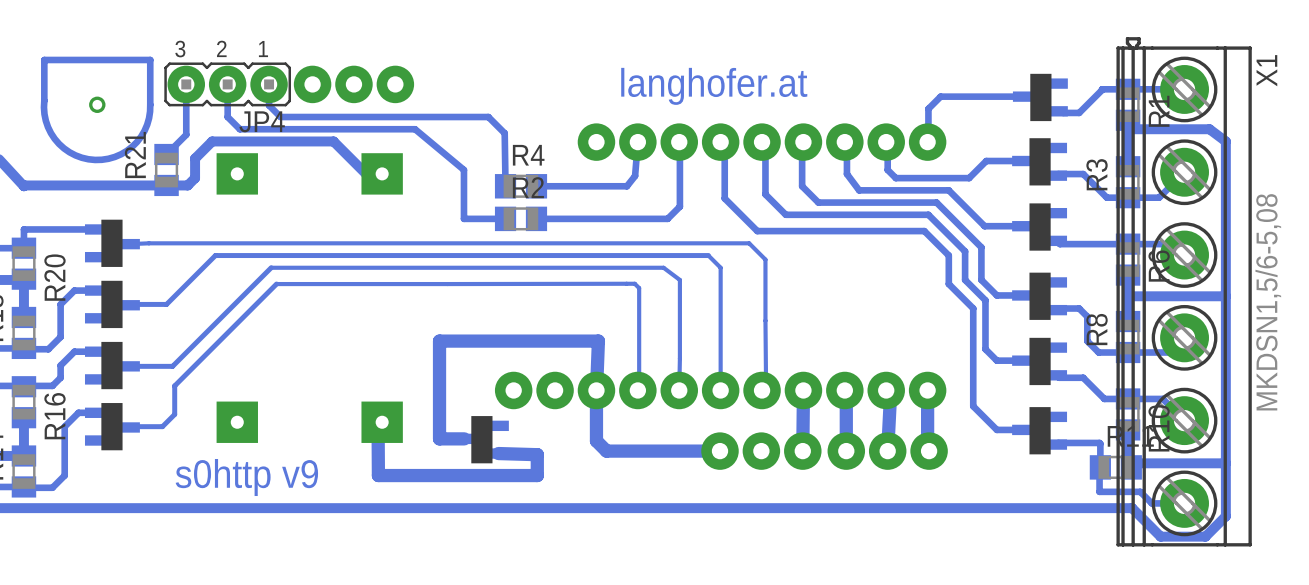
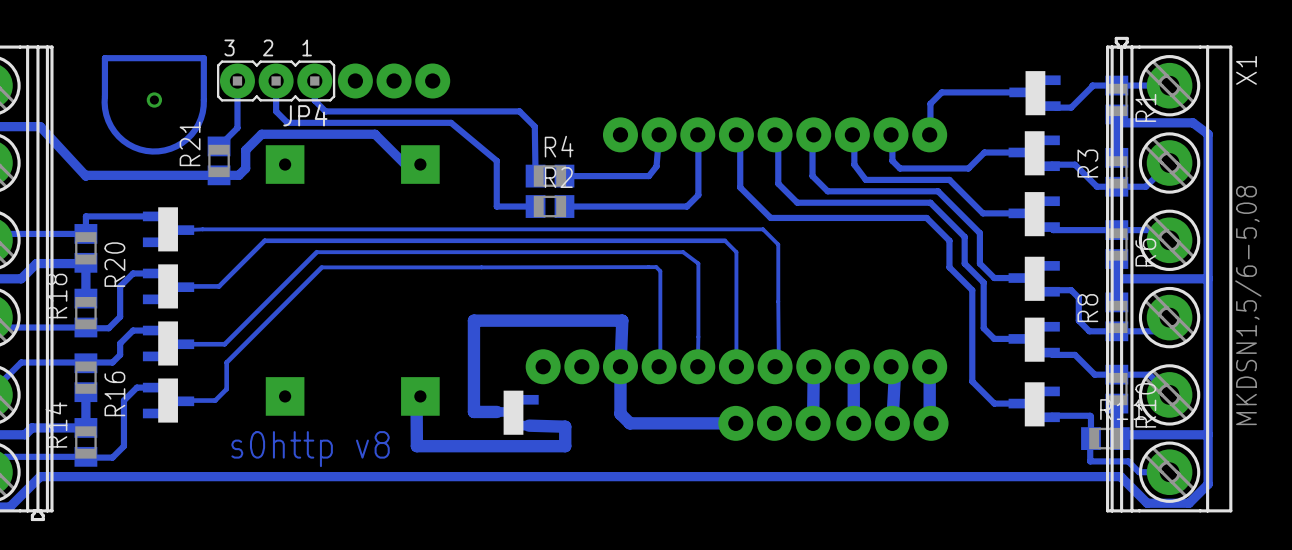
text: langhofer.at (714, 86) -> none
text: s0http v9 (246, 477) -> s0http v8 (310, 449)

